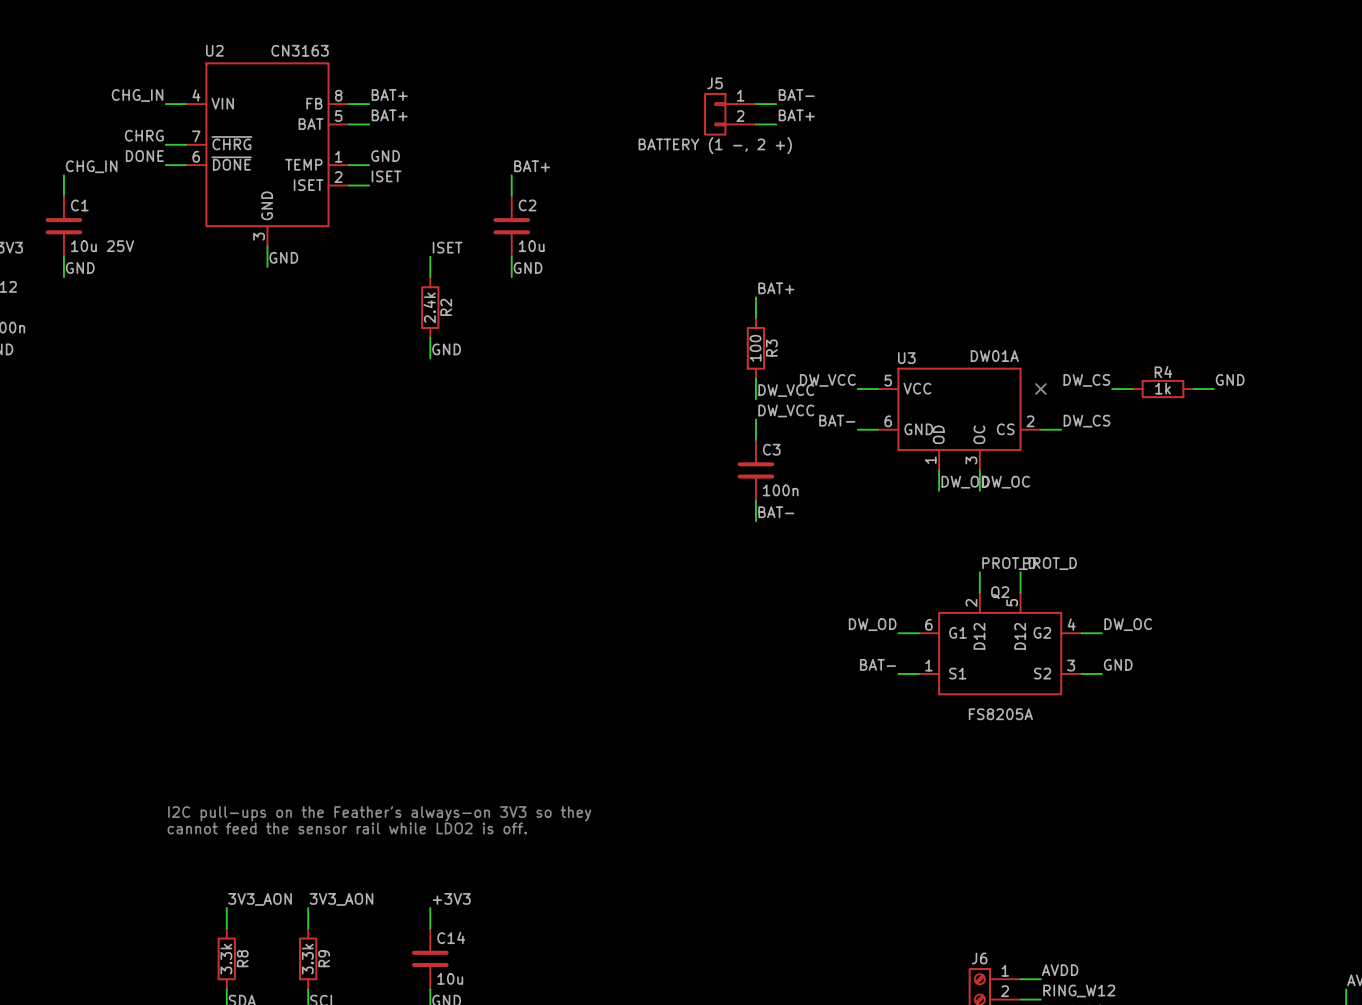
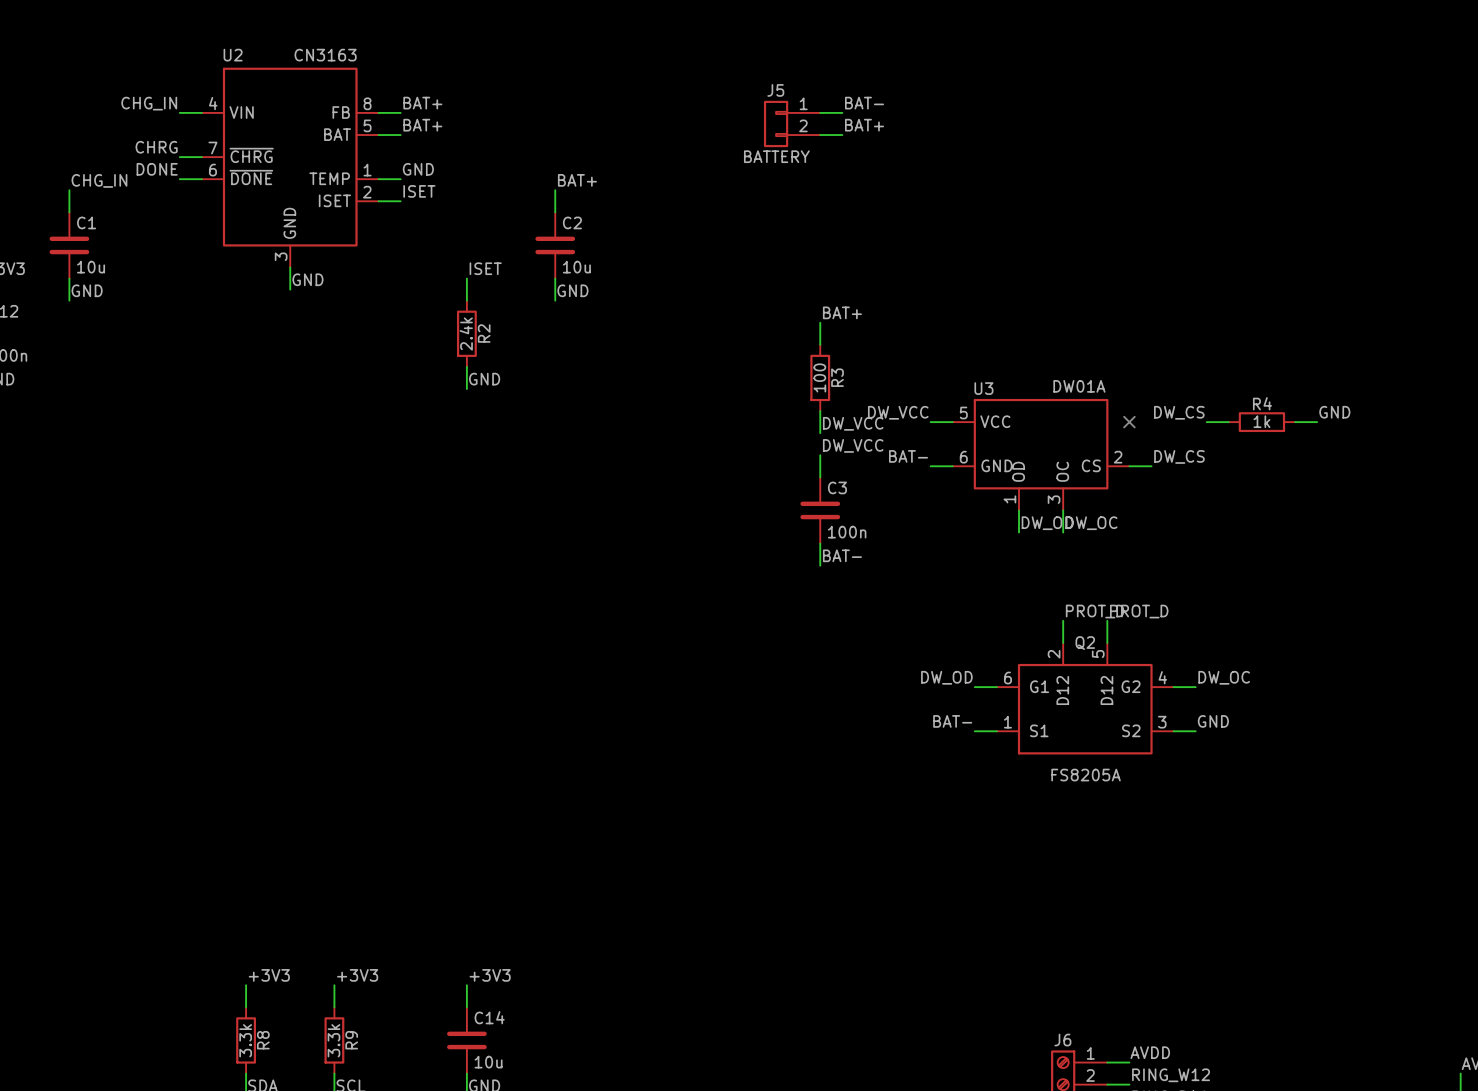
J5 value: BATTERY (1 -, 2 +) (715, 145) -> BATTERY (776, 156)
C1 value: 10u 25V (102, 246) -> 10u (91, 267)
text: I2C pull-ups on the Feather's always-on 3V3 so they (379, 813) -> none
text: cannot feed the sensor rail while LDO2 is off. (347, 828) -> none
label: 3V3_AON (260, 899) -> +3V3 (269, 975)
label: 3V3_AON (341, 899) -> +3V3 (357, 975)

